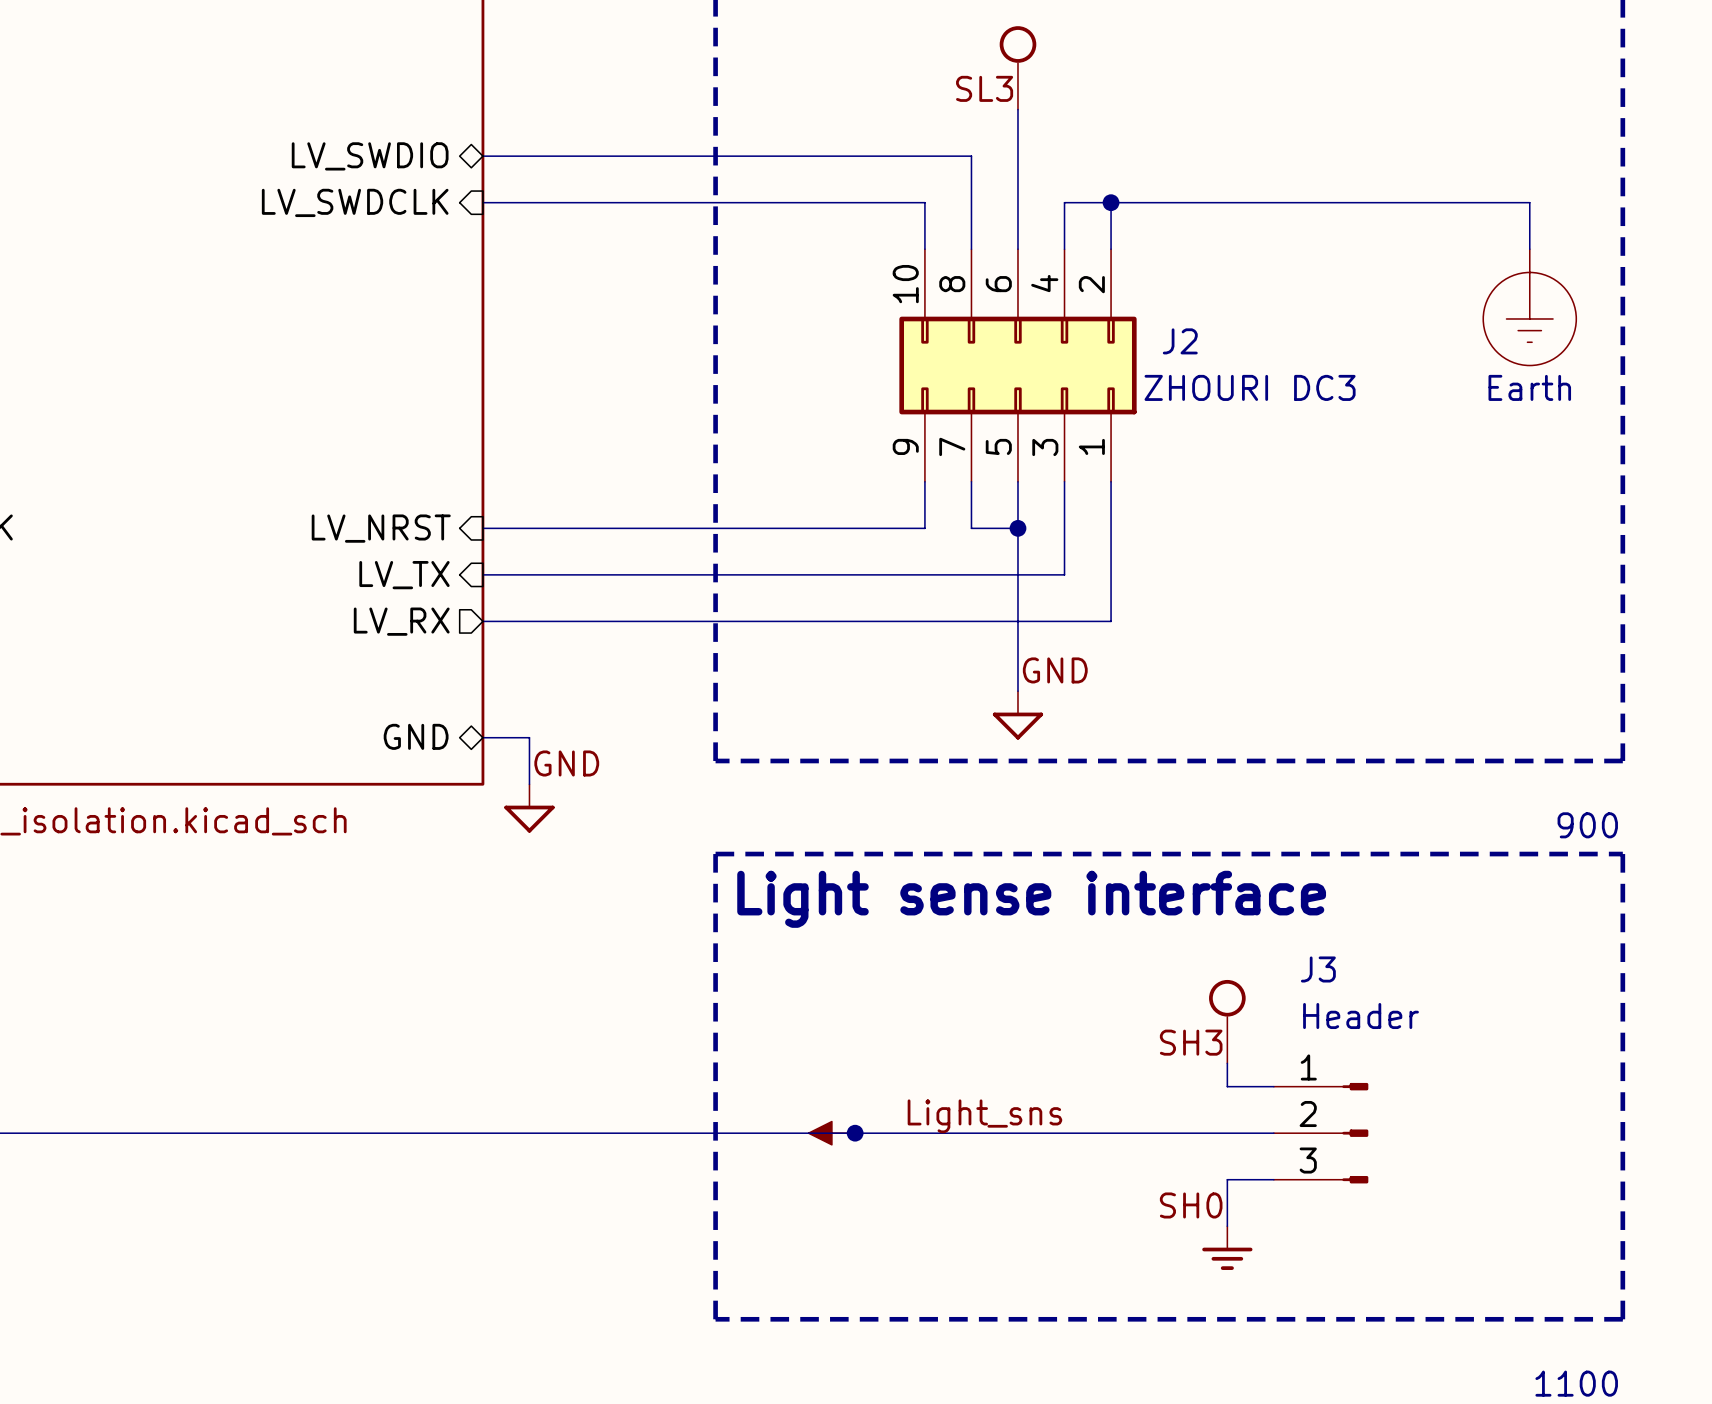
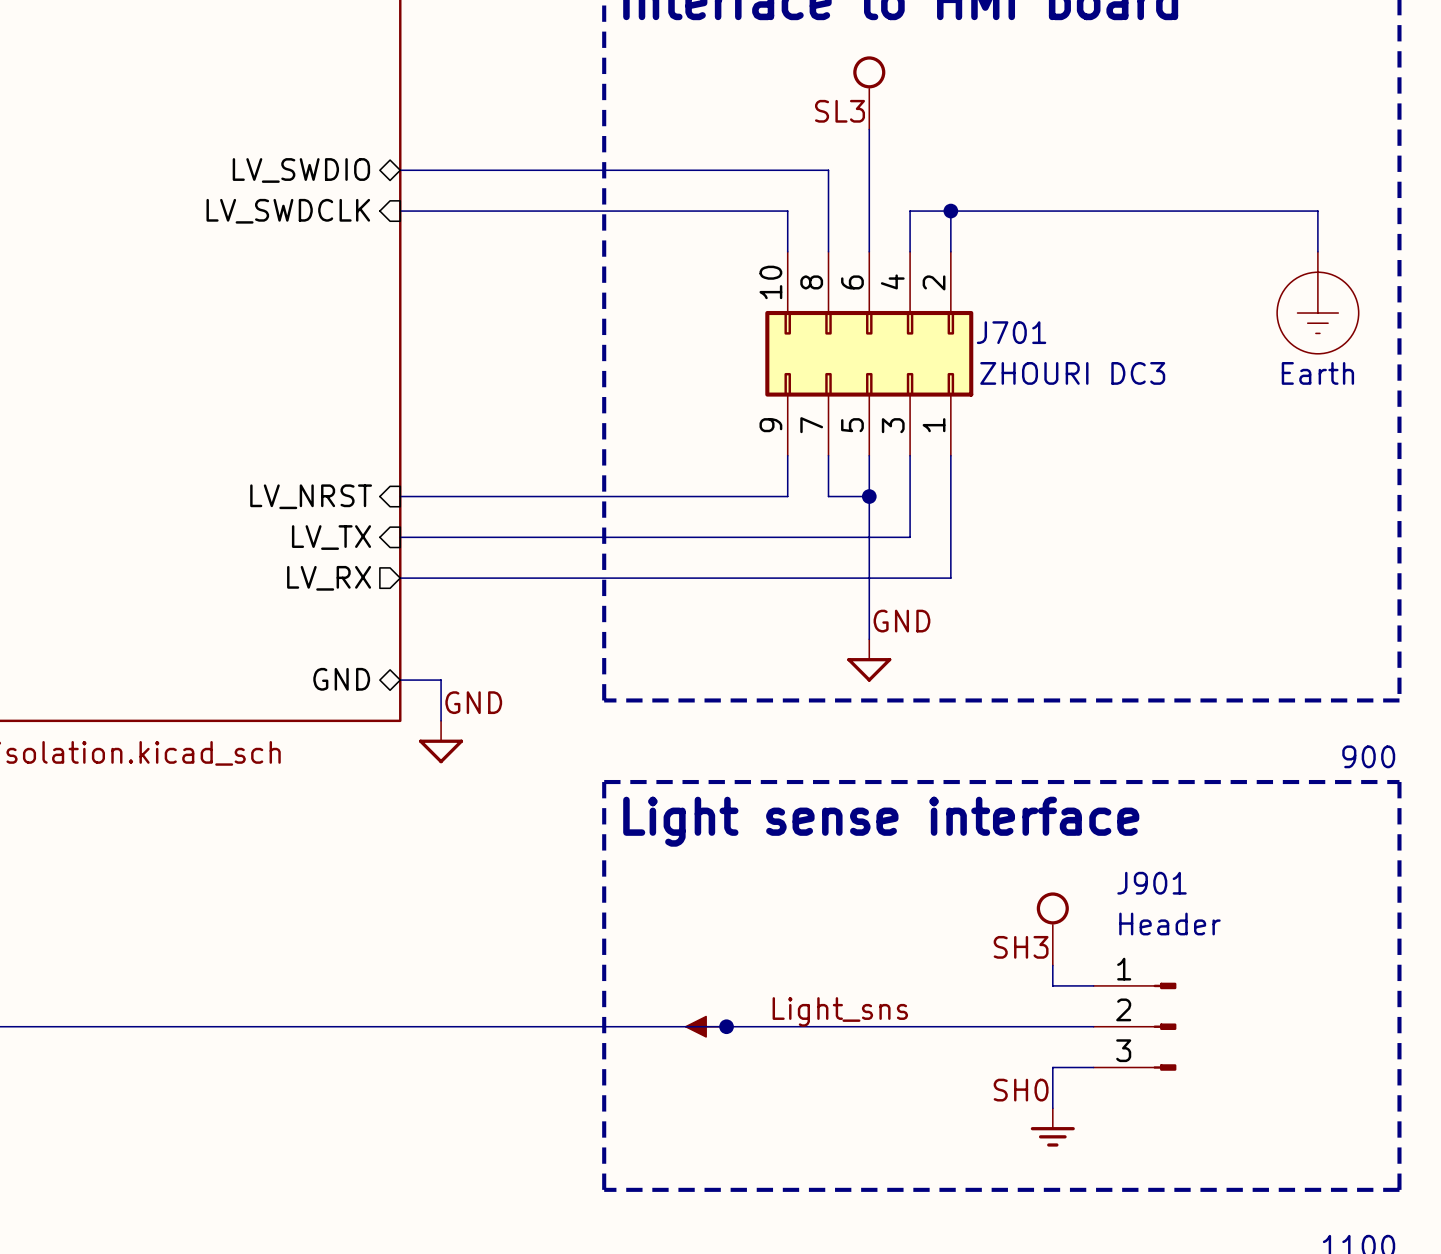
J2 name: J2 (1180, 341) -> J701 (1011, 332)
J3 name: J3 (1318, 969) -> J901 (1152, 883)

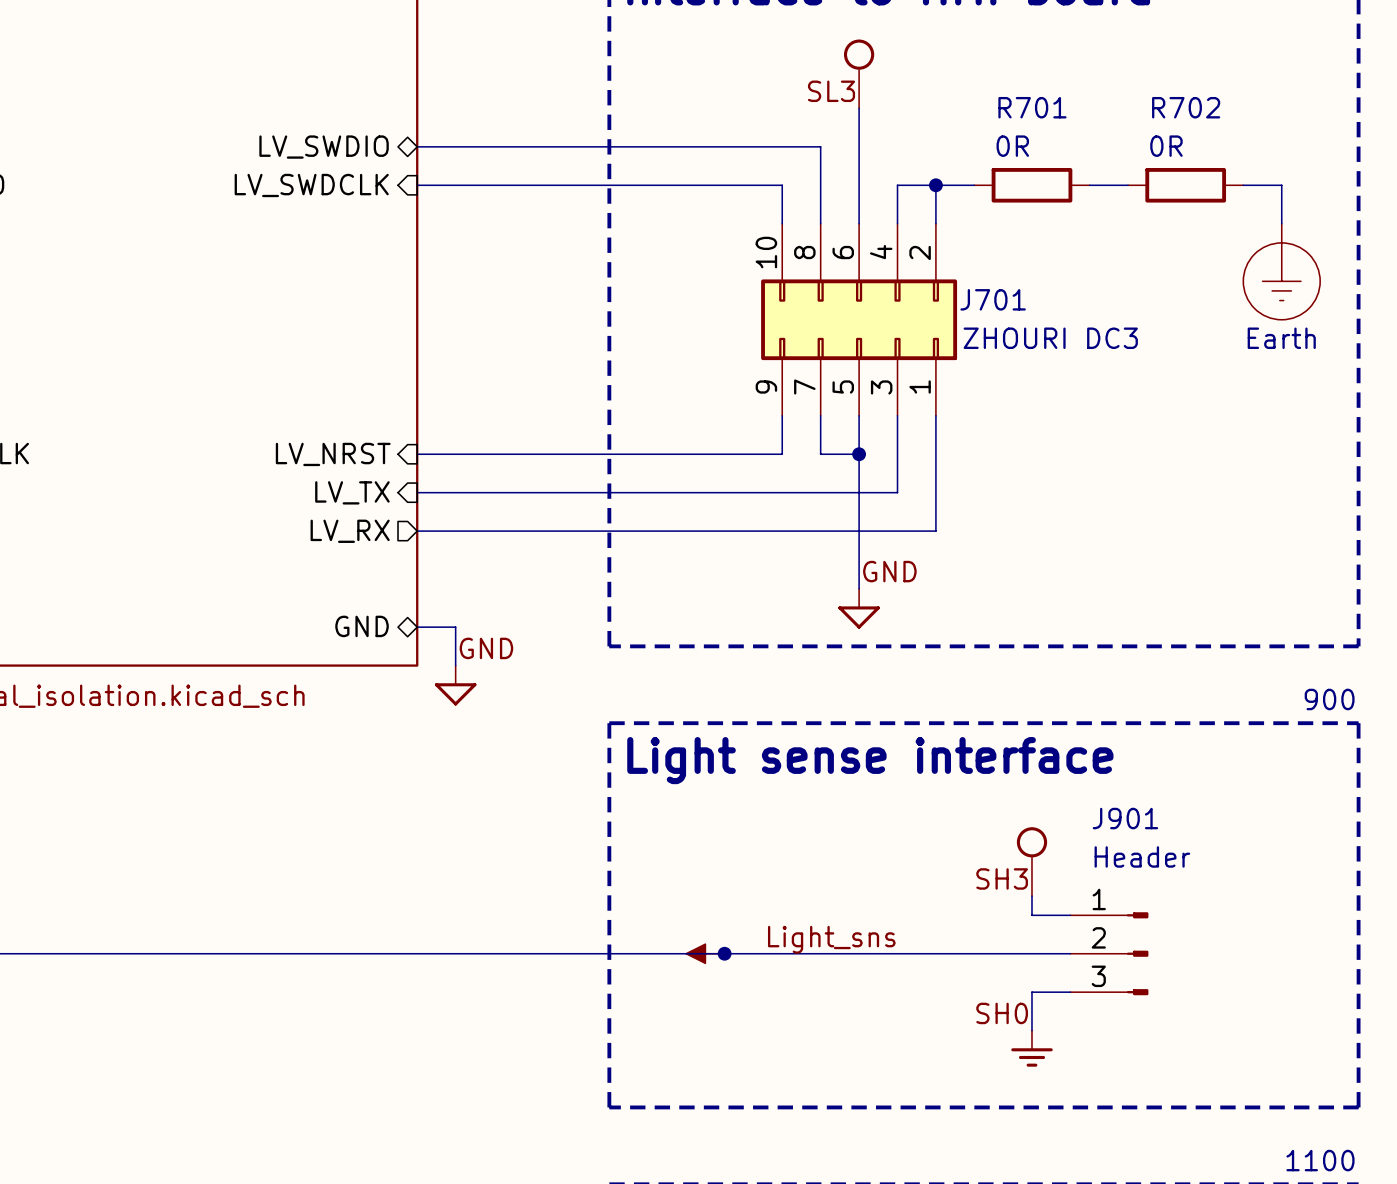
wire: (991, 211) (1113, 211) -> none
R701: none -> 0R (1031, 185)
wire: (1154, 211) (1277, 211) -> none
R702: none -> 0R (1185, 185)

